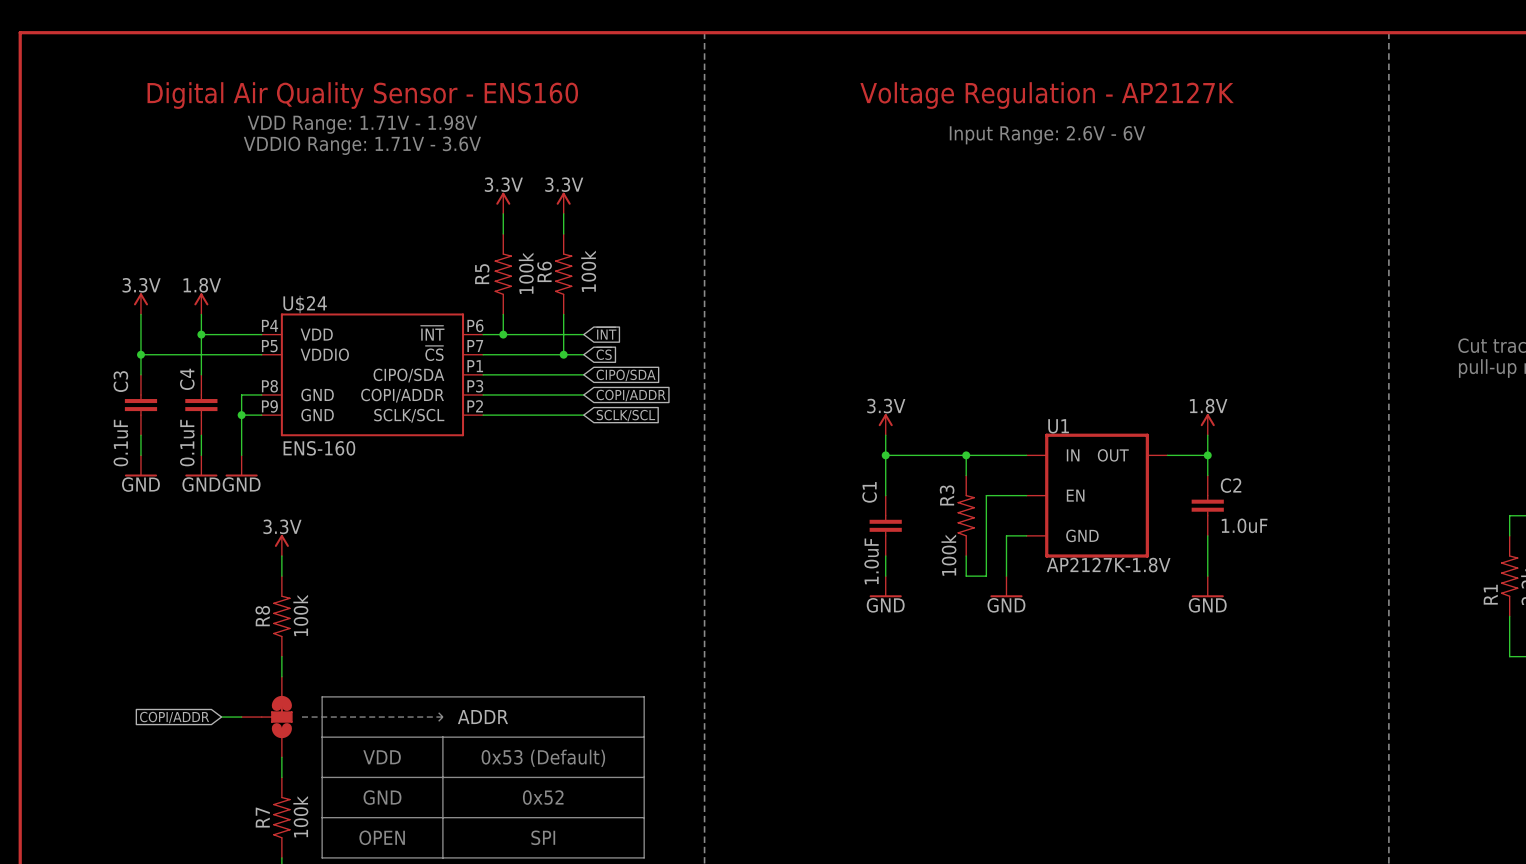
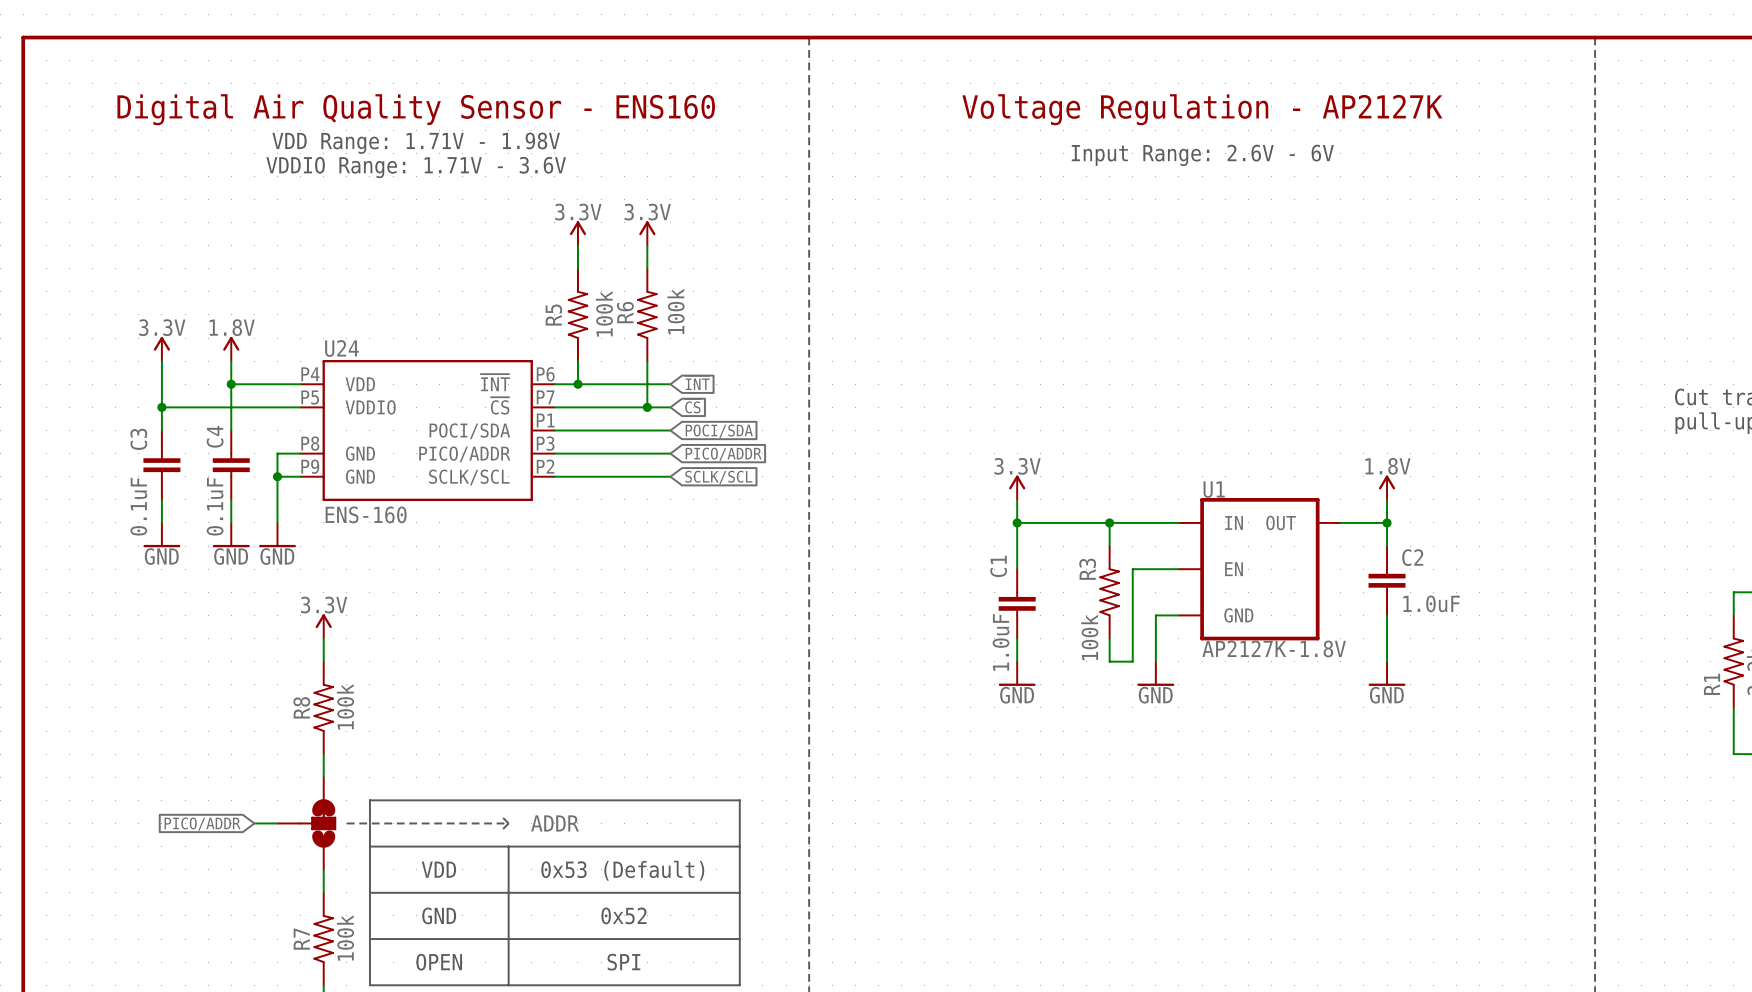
U$24 name: U$24 (305, 304) -> U24 (342, 348)
U$24 pin name: CIPO/SDA (408, 375) -> POCI/SDA (469, 431)
global label: CIPO/SDA (626, 375) -> POCI/SDA (719, 431)
U$24 pin name: COPI/ADDR (402, 395) -> PICO/ADDR (464, 454)
global label: COPI/ADDR (631, 395) -> PICO/ADDR (723, 454)
global label: COPI/ADDR (174, 717) -> PICO/ADDR (202, 824)

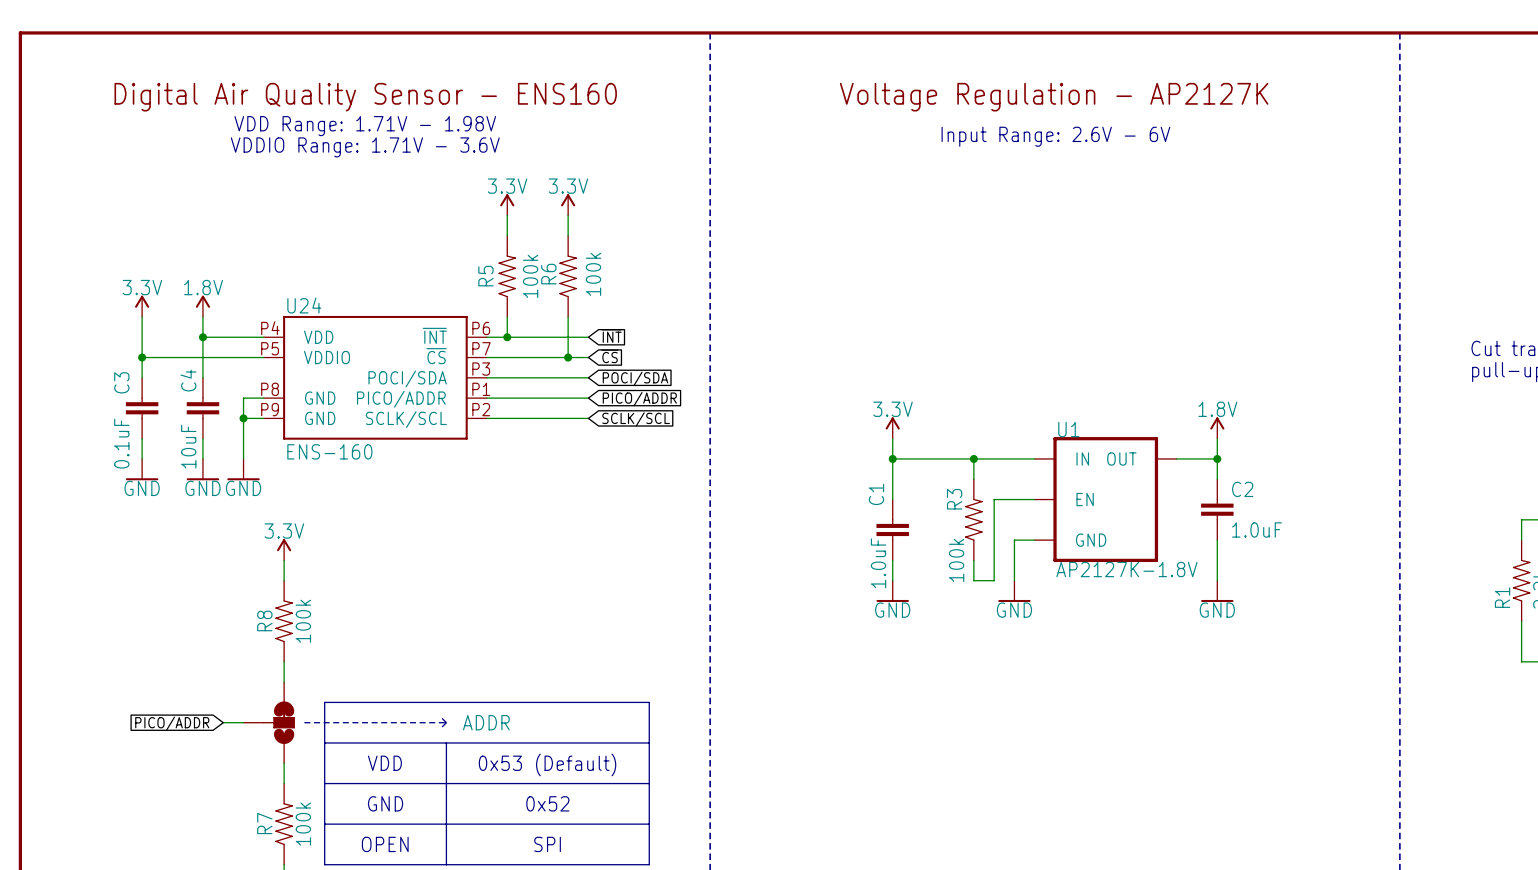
U24 pin number: P1 (545, 420) -> P3 (481, 369)
U24 pin number: P3 (545, 443) -> P1 (481, 389)
C4 value: 0.1uF (215, 506) -> 10uF (188, 446)

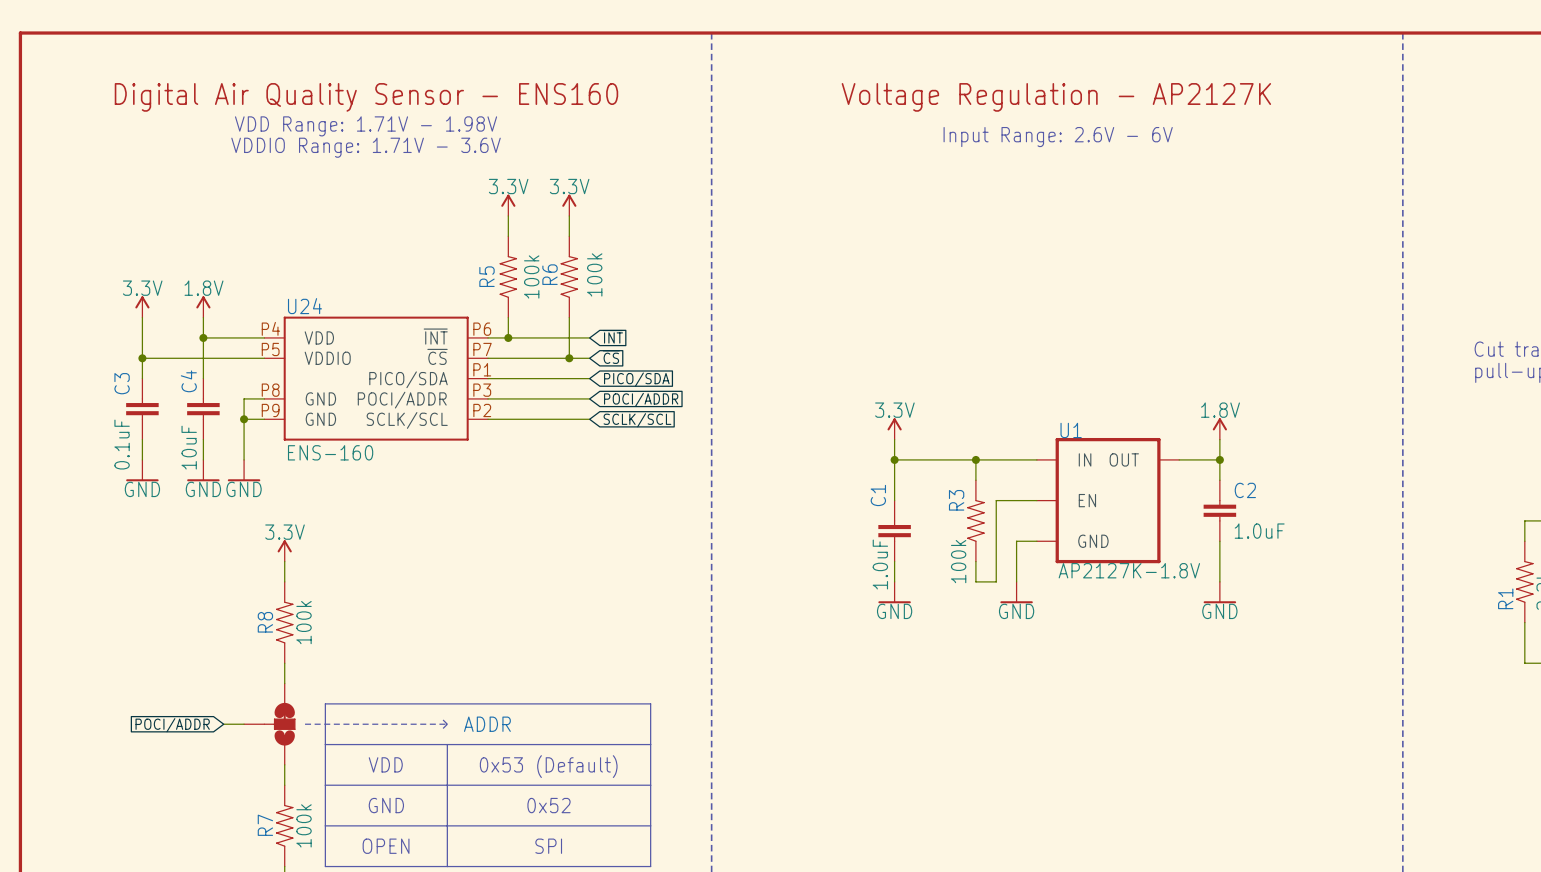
U24 pin number: P3 (481, 369) -> P1 (482, 369)
U24 pin name: POCI/SDA (407, 378) -> PICO/SDA (408, 379)
global label: POCI/SDA (635, 378) -> PICO/SDA (636, 379)
U24 pin number: P1 (481, 389) -> P3 (482, 390)
U24 pin name: PICO/ADDR (401, 399) -> POCI/ADDR (402, 400)
global label: PICO/ADDR (639, 399) -> POCI/ADDR (641, 399)
global label: PICO/ADDR (172, 723) -> POCI/ADDR (172, 725)

